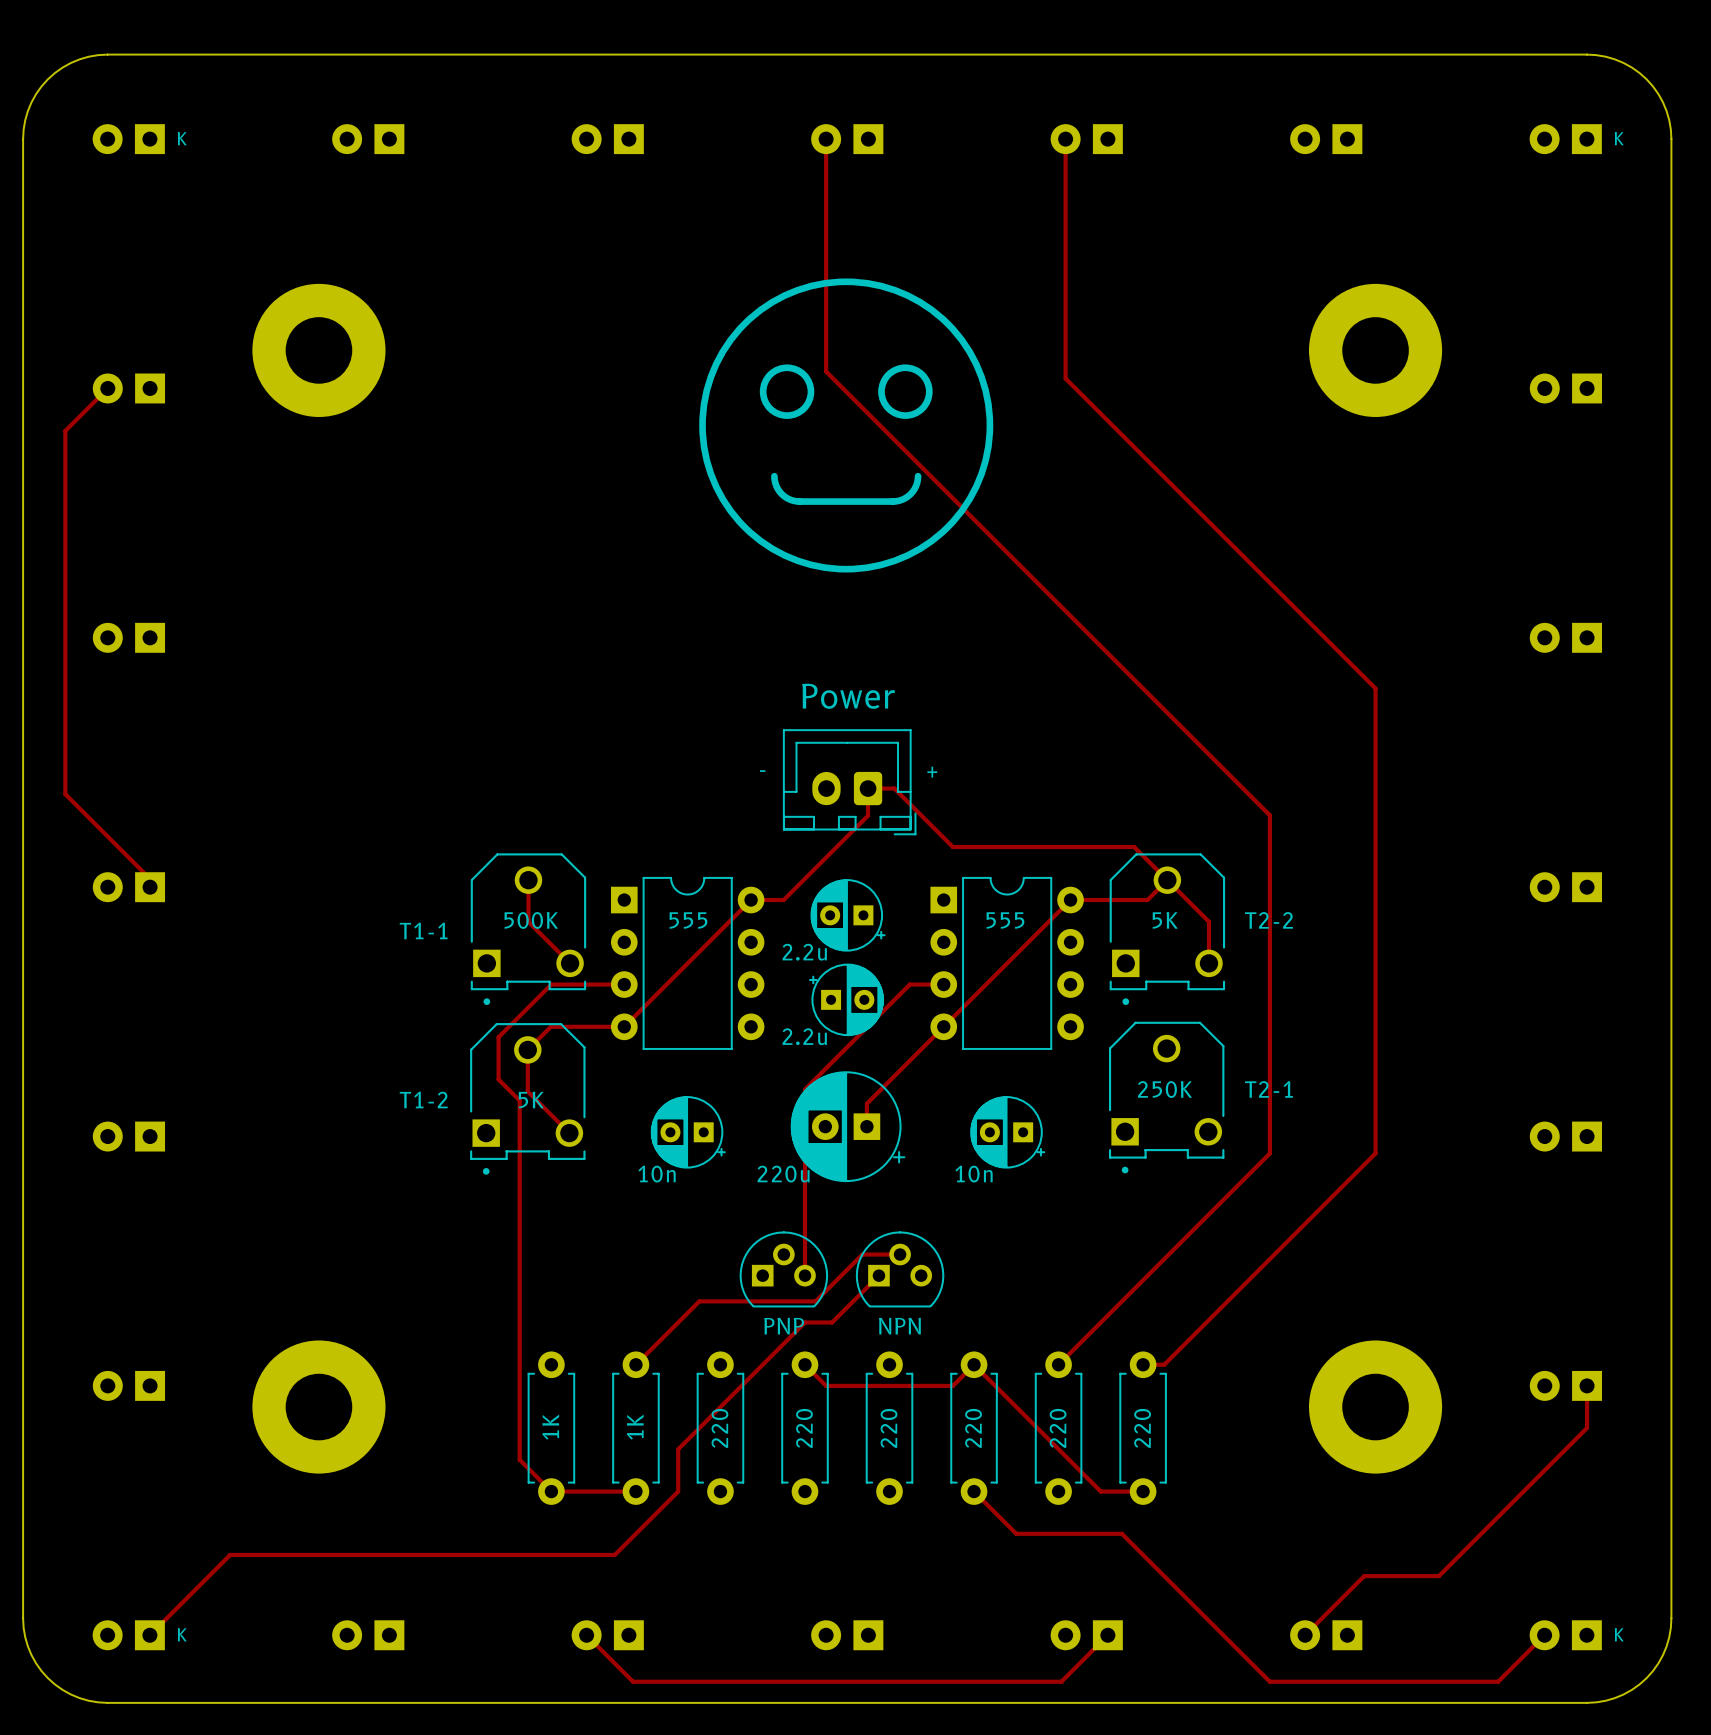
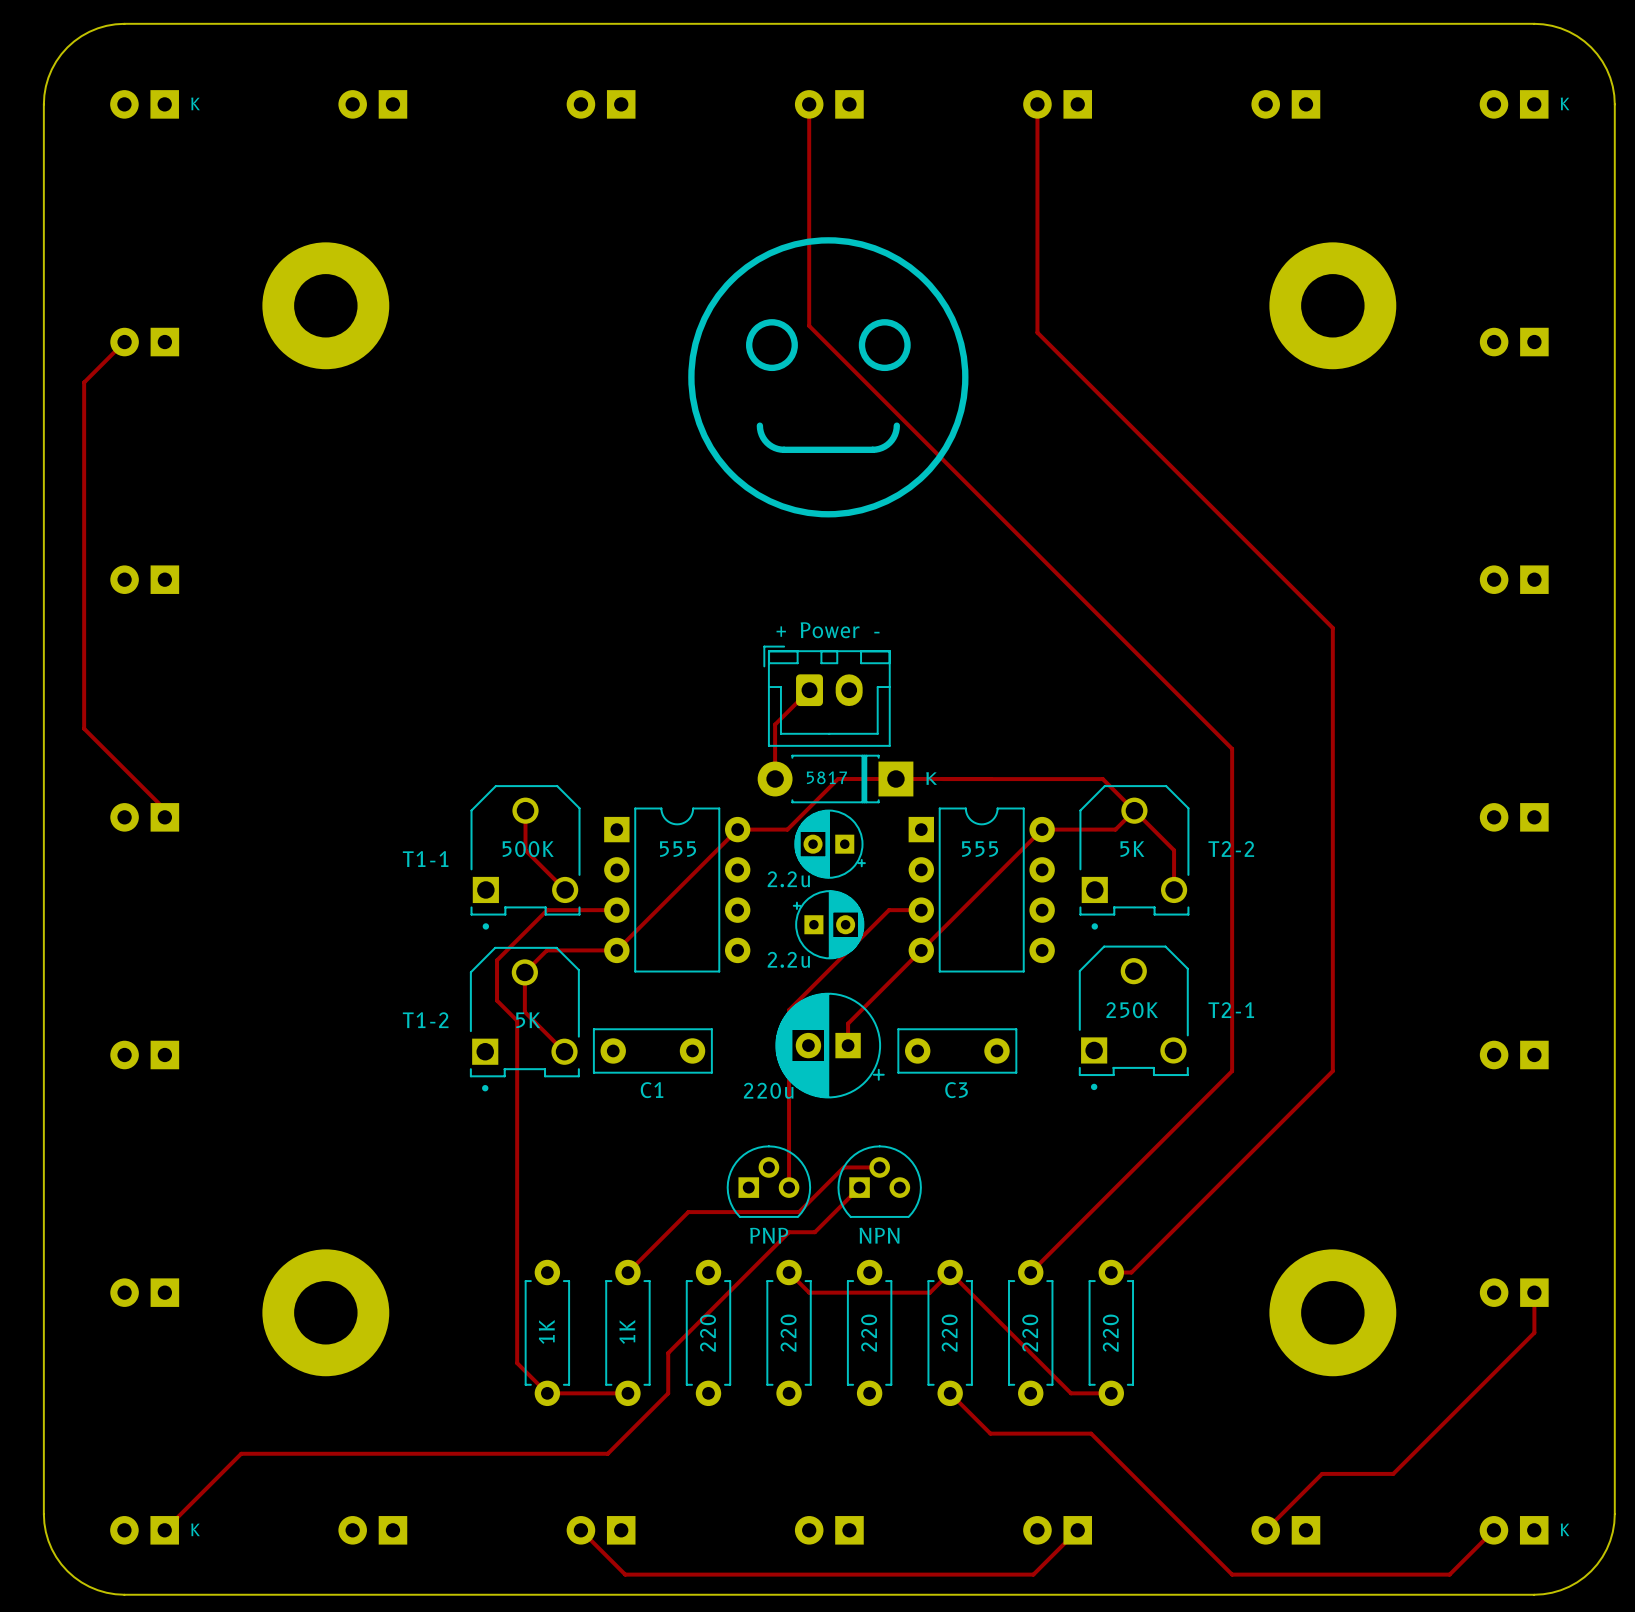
track: none -> (809, 690) (775, 724) (775, 779)
part: none -> Power (827, 696)
part: Power (849, 782) -> none
part: none -> 5817 (835, 779)
track: (966, 847) (952, 847) (894, 788) (868, 788) (868, 815) (783, 900) -> (991, 779) (838, 779) (787, 829) (768, 829)
C1: none -> (652, 1050)
part: 10n (688, 1132) -> none
C3: none -> (957, 1050)
part: 10n (1007, 1132) -> none

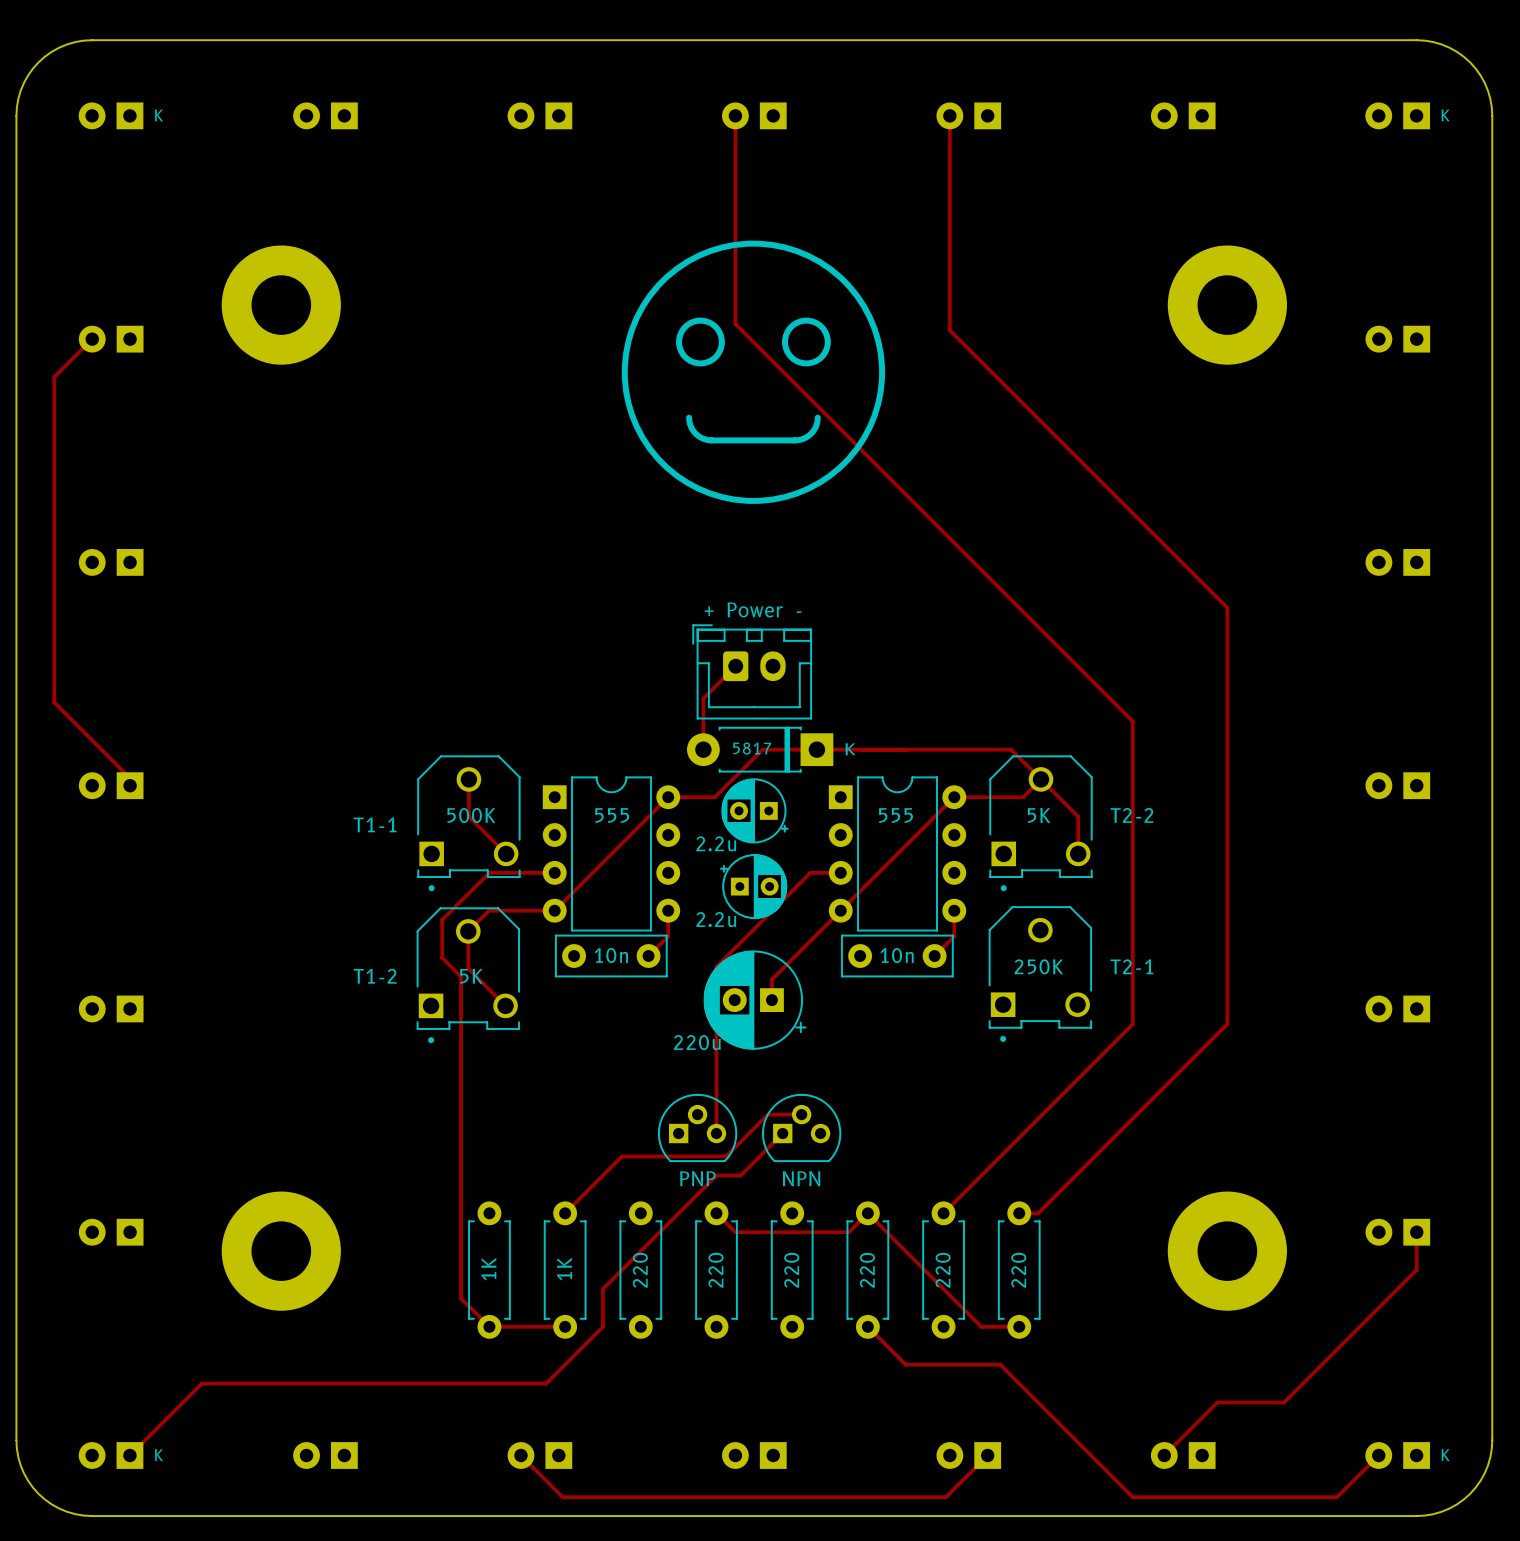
track: none -> (668, 910) (668, 936) (648, 956)
track: none -> (954, 910) (954, 936) (934, 956)
part: none -> 10n (611, 956)
part: none -> 10n (897, 956)
C1: (652, 1050) -> none
C3: (957, 1050) -> none

